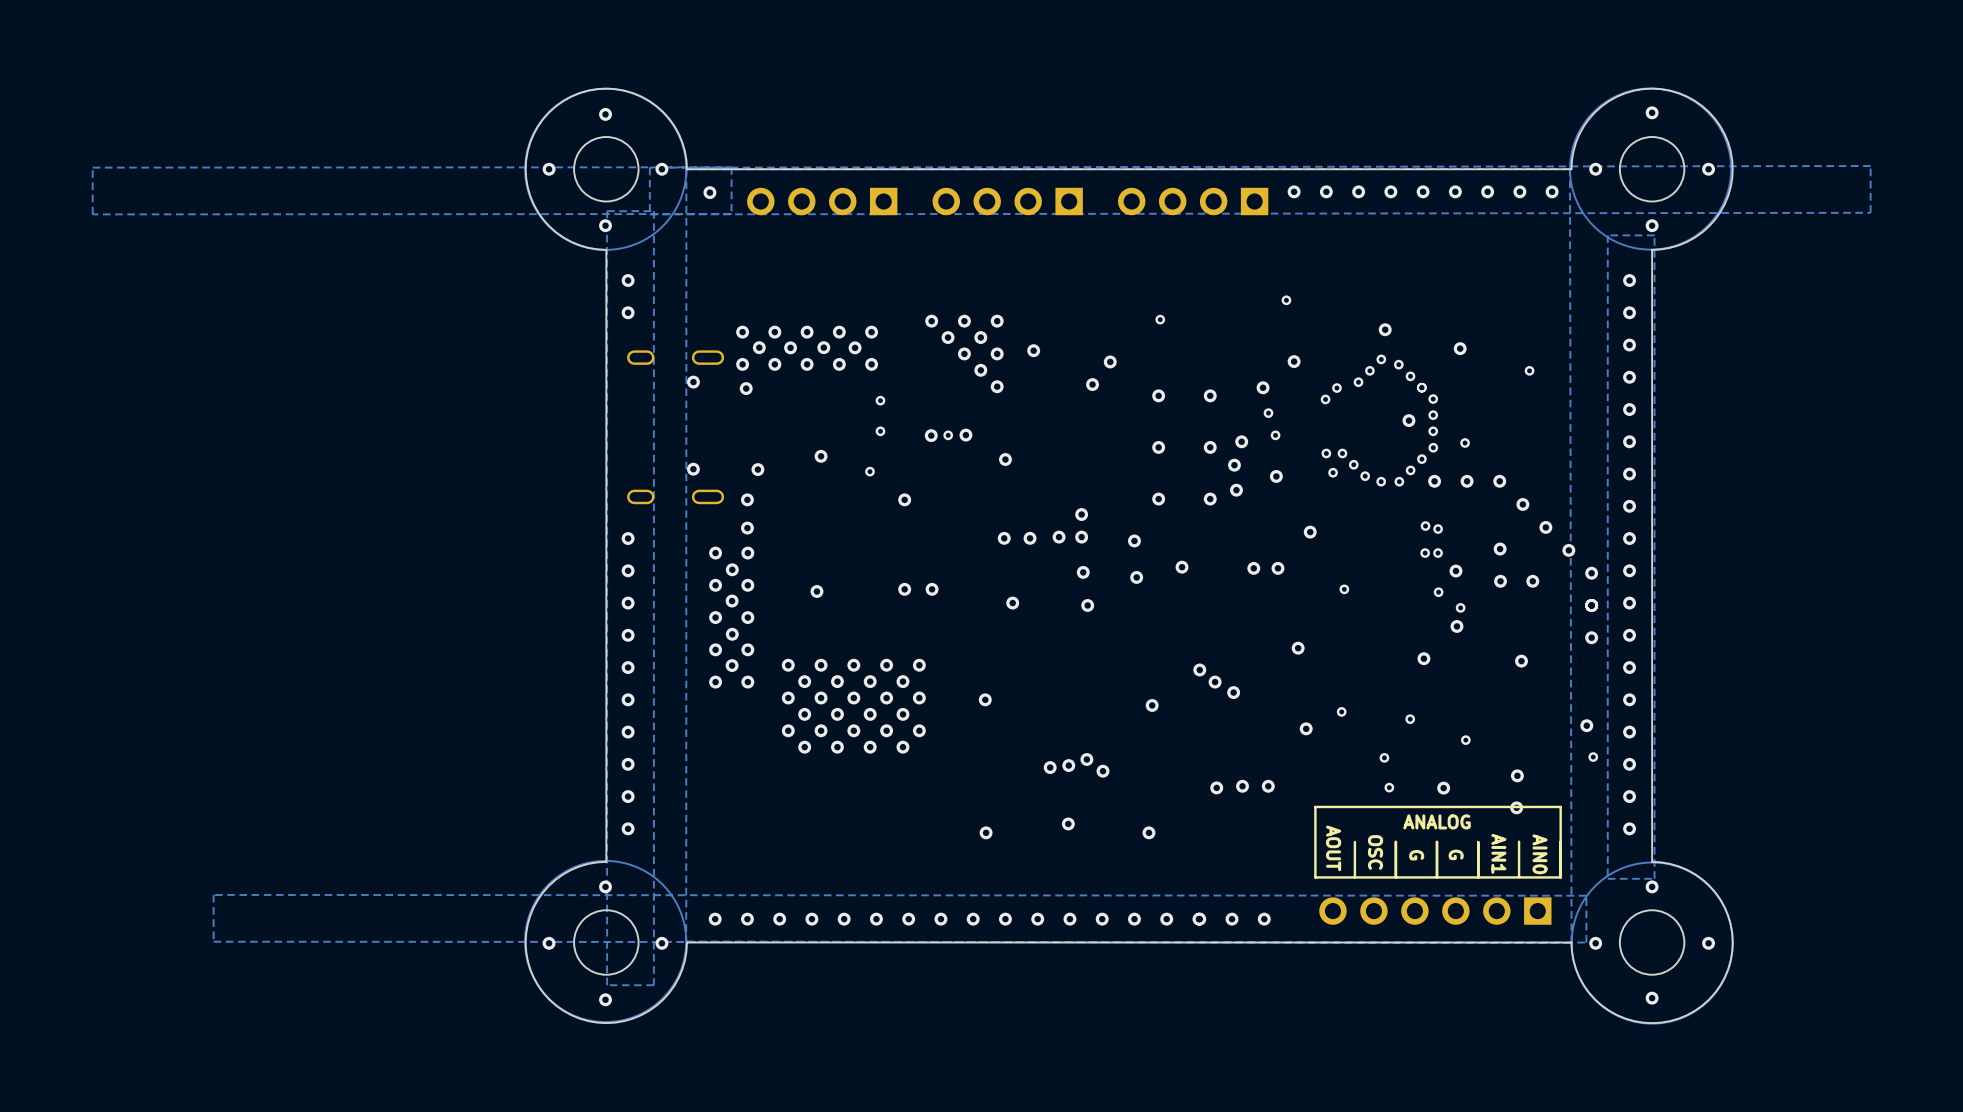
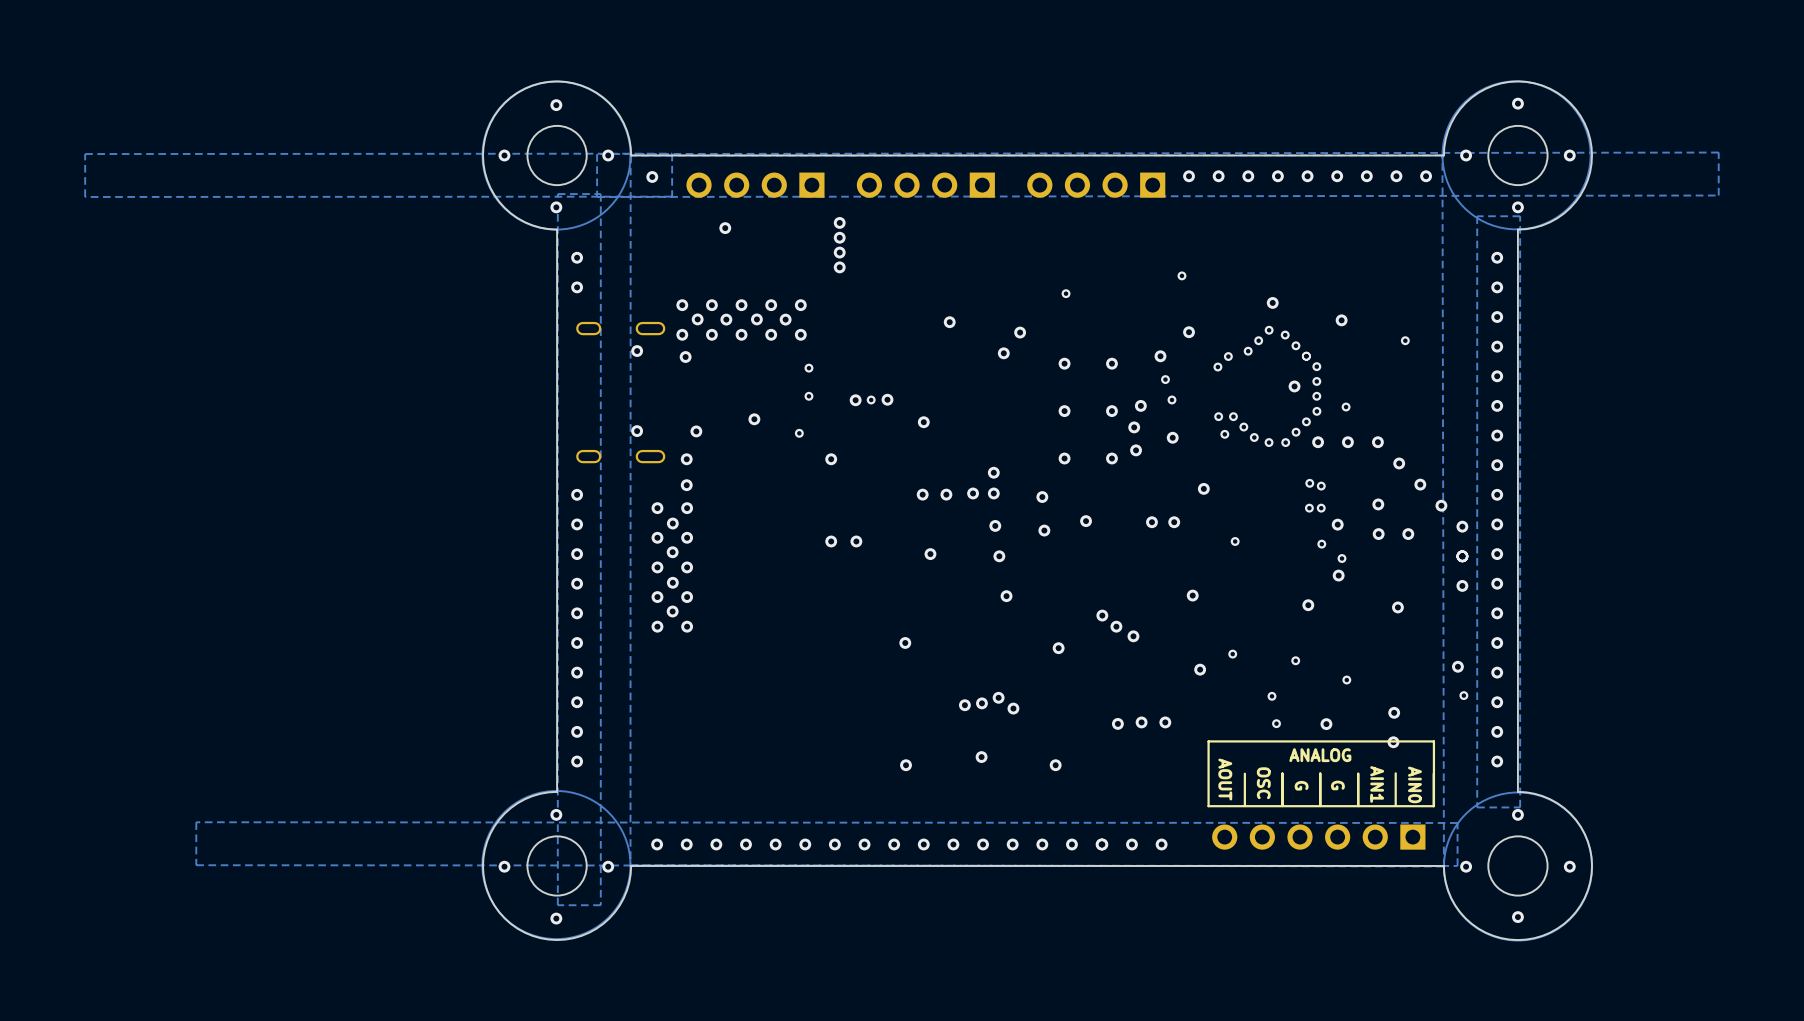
via: none -> (839, 222)
via: none -> (725, 228)
via: none -> (839, 237)
via: none -> (839, 252)
via: none -> (839, 267)
via: (931, 321) -> none
via: (964, 321) -> none
via: (997, 321) -> none
via: (948, 337) -> none
via: (980, 337) -> none
via: (964, 353) -> none
via: (997, 353) -> none
via: (980, 370) -> none
via: (997, 386) -> none
via: (816, 591) -> none
via: none -> (1006, 596)
via: (788, 665) -> none
via: (821, 665) -> none
via: (853, 665) -> none
via: (886, 665) -> none
via: (919, 665) -> none
via: (804, 681) -> none
via: (837, 681) -> none
via: (870, 681) -> none
via: (902, 681) -> none
via: (788, 698) -> none
via: (821, 698) -> none
via: (853, 698) -> none
via: (886, 698) -> none
via: (919, 698) -> none
via: (804, 714) -> none
via: (837, 714) -> none
via: (870, 714) -> none
via: (902, 714) -> none
via: (788, 730) -> none
via: (821, 730) -> none
via: (853, 730) -> none
via: (886, 730) -> none
via: (919, 730) -> none
via: (804, 747) -> none
via: (837, 747) -> none
via: (870, 747) -> none
via: (902, 747) -> none

